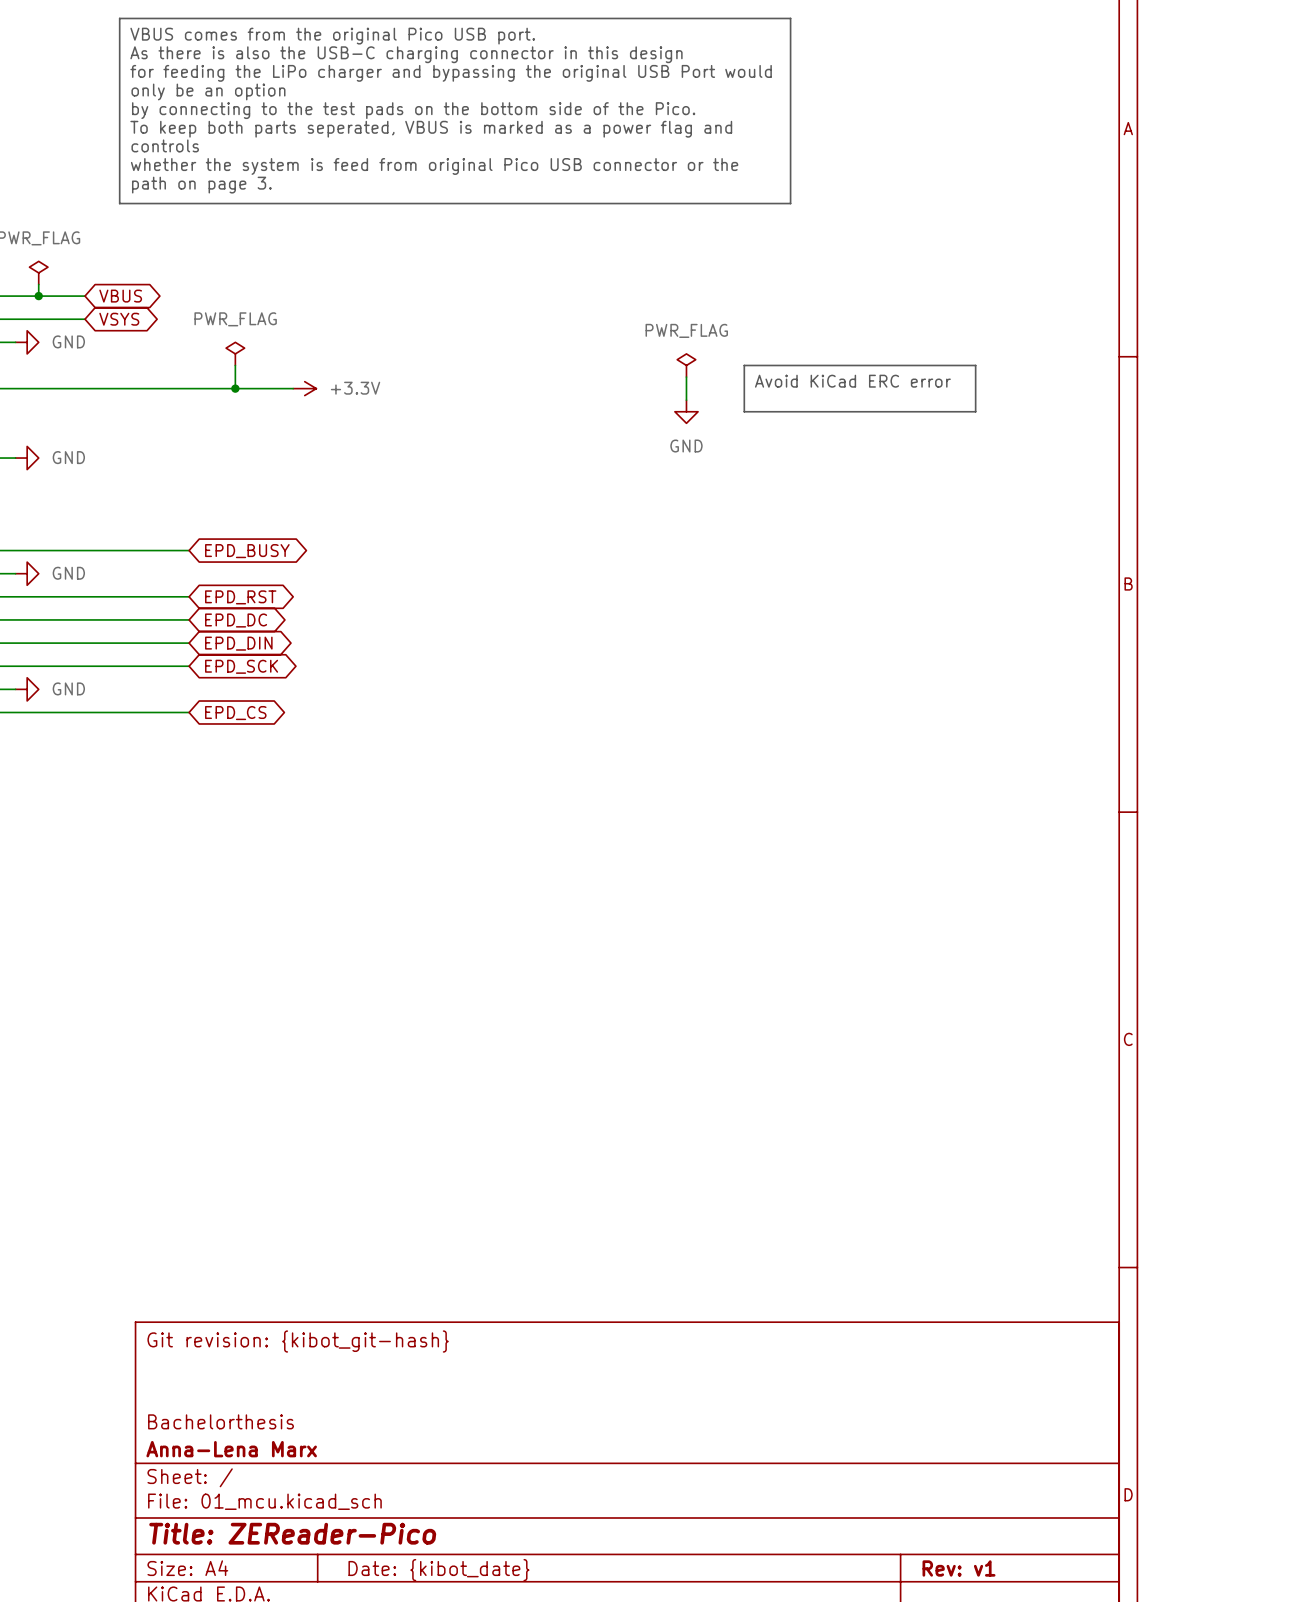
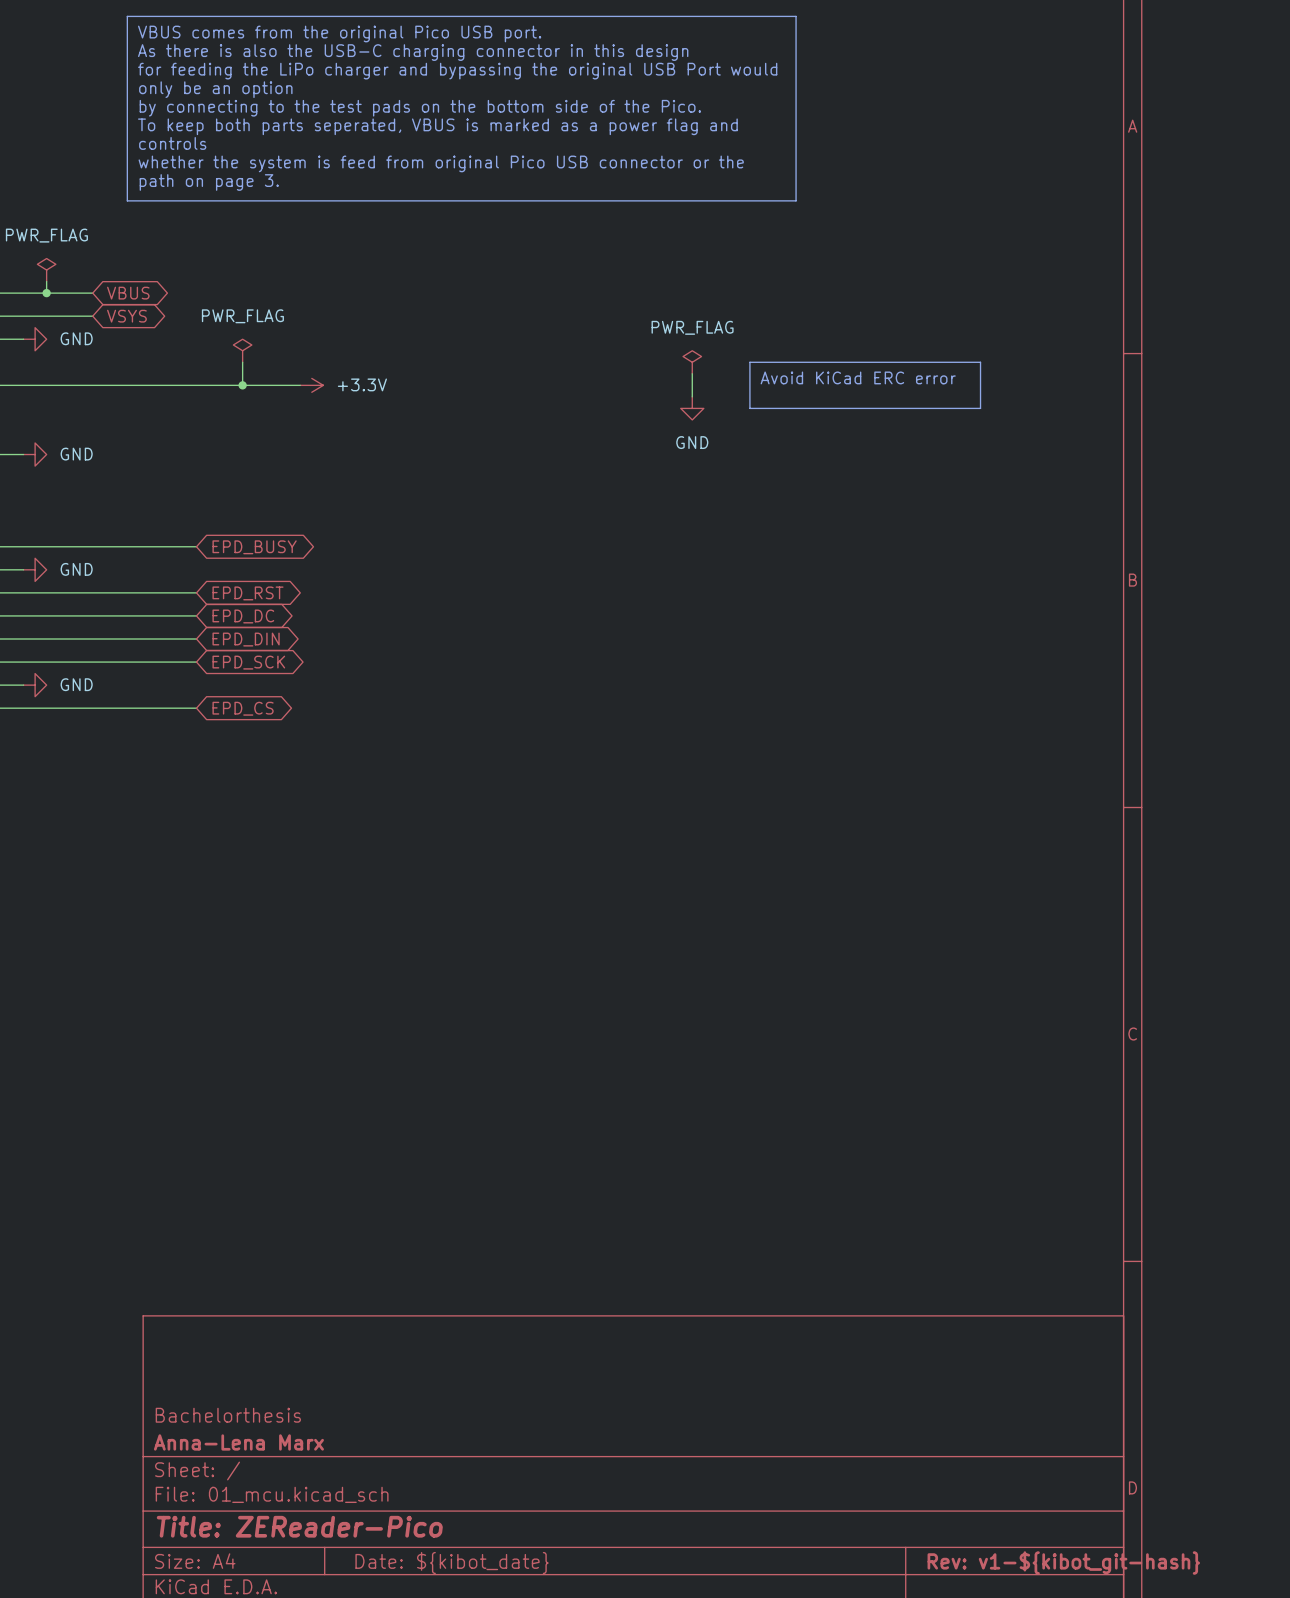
title block: Git revision: {kibot_git-hash} (298, 1341) -> none
title block: Rev: v1 (959, 1568) -> Rev: v1-${kibot_git-hash} (1063, 1563)
title block: Date: {kibot_date} (438, 1570) -> Date: ${kibot_date} (452, 1563)

